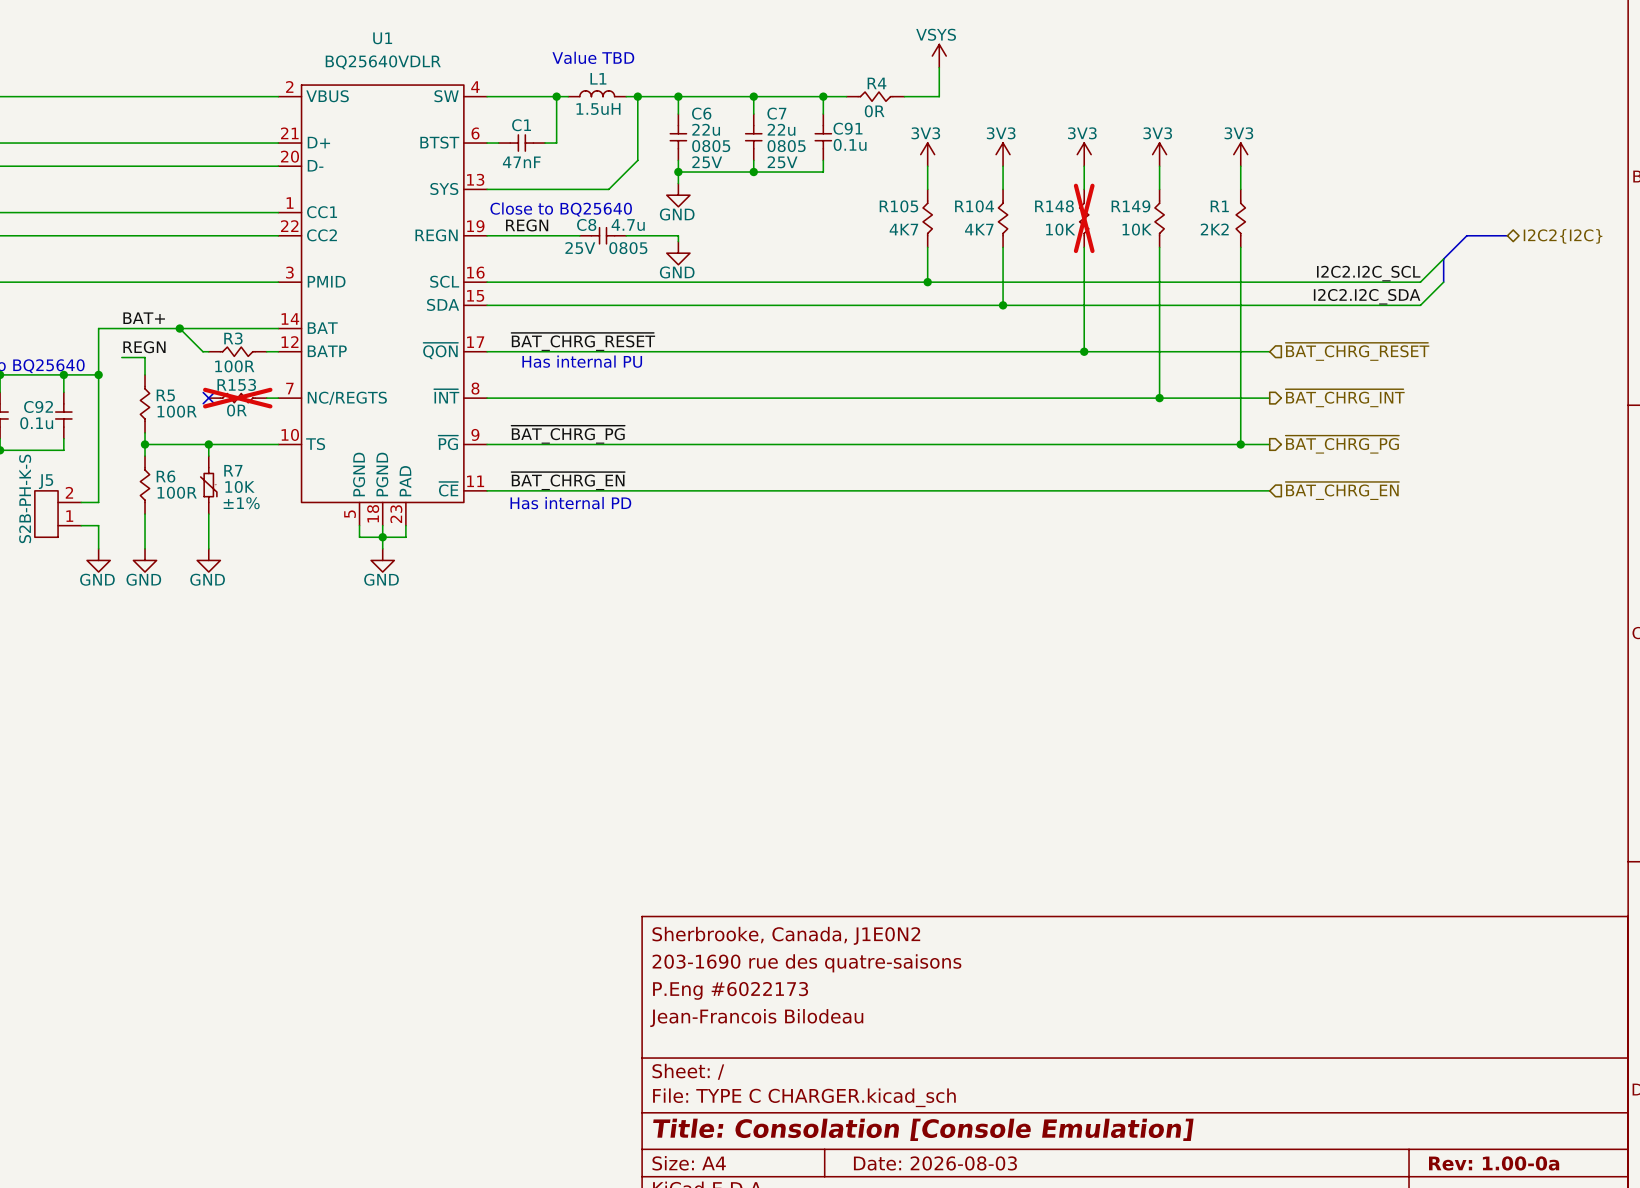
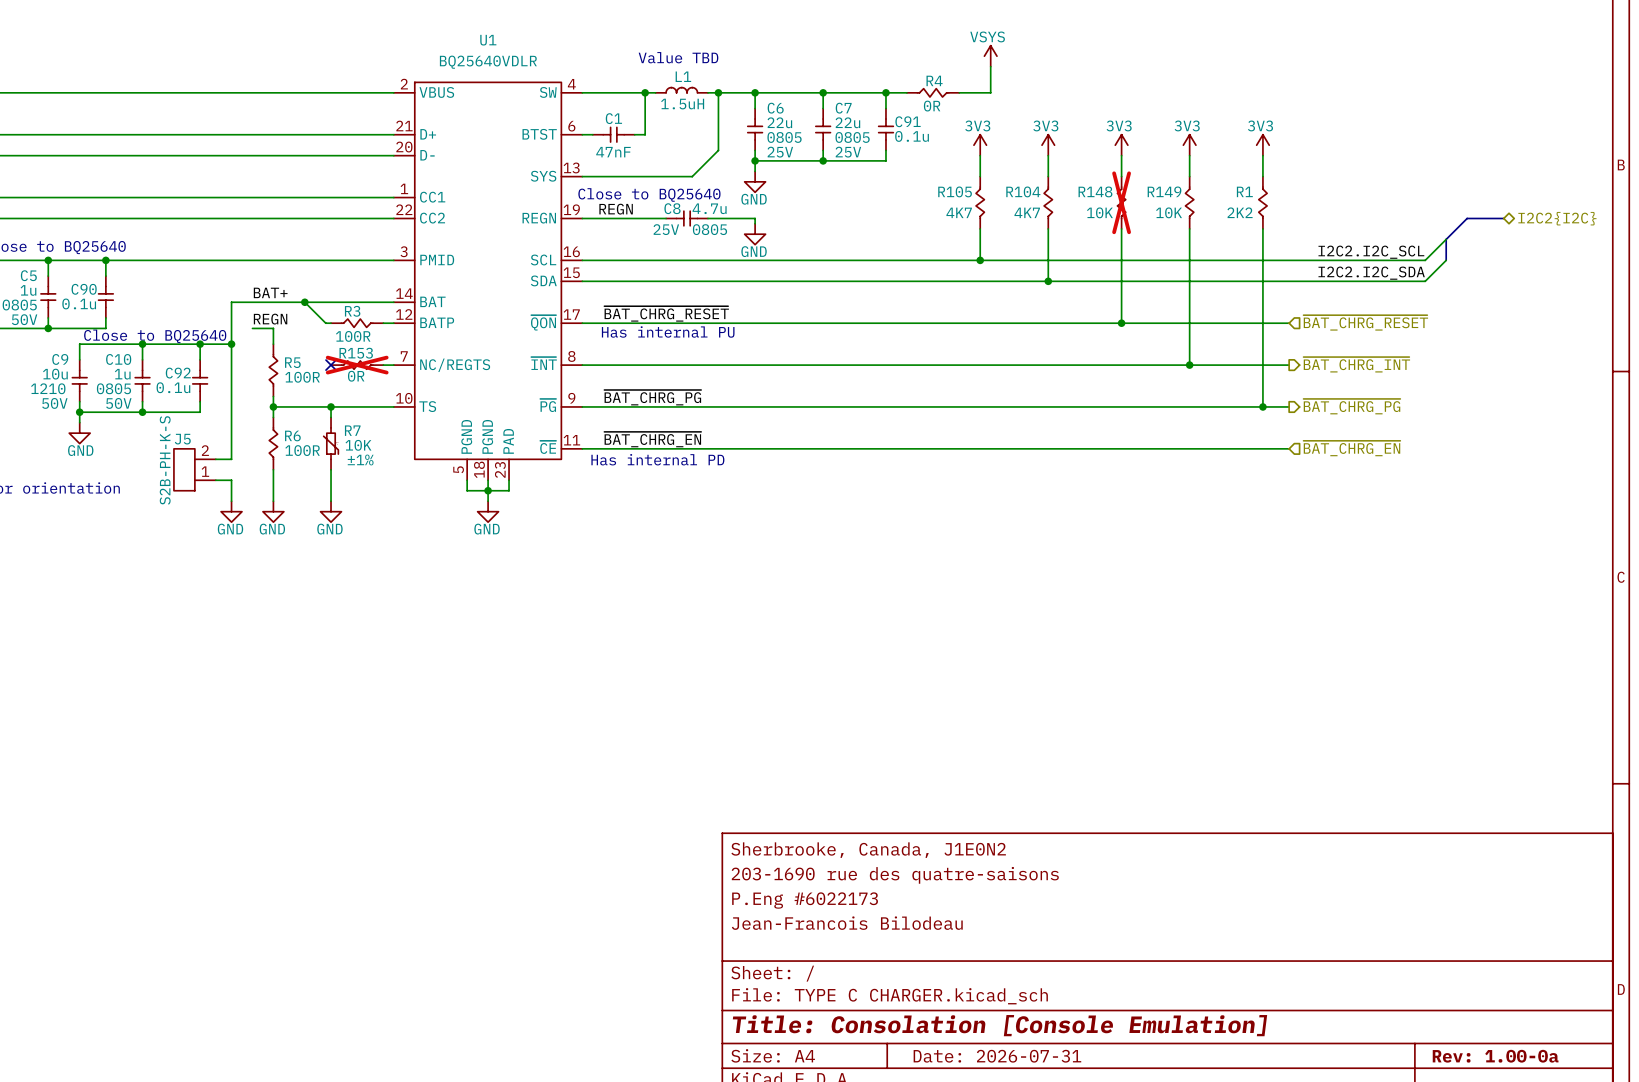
title block: Date: 2026-08-03 (935, 1163) -> Date: 2026-07-31 (997, 1056)

